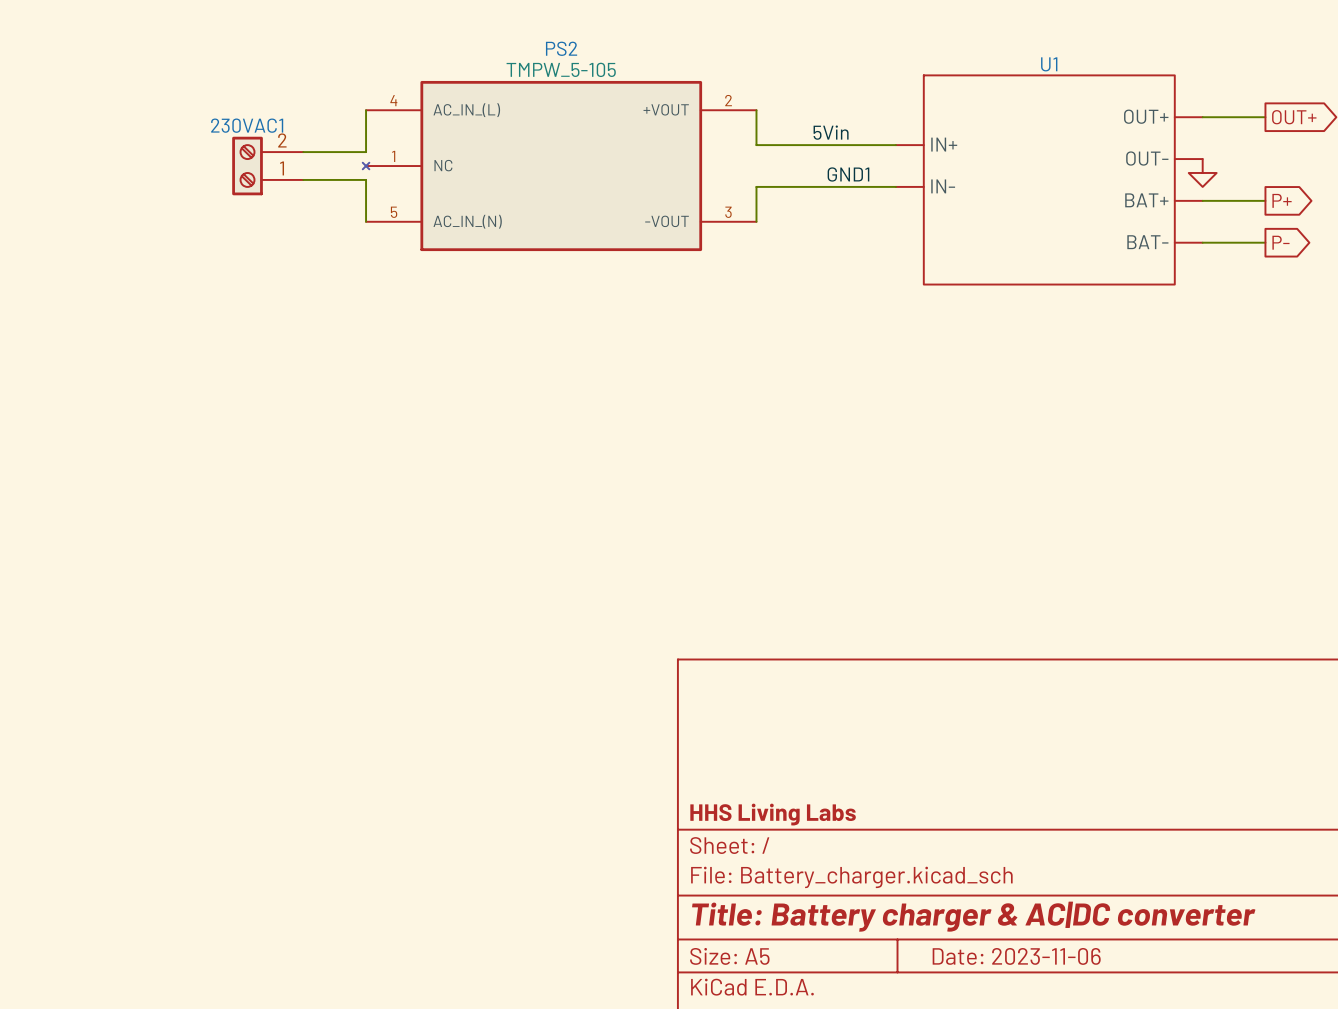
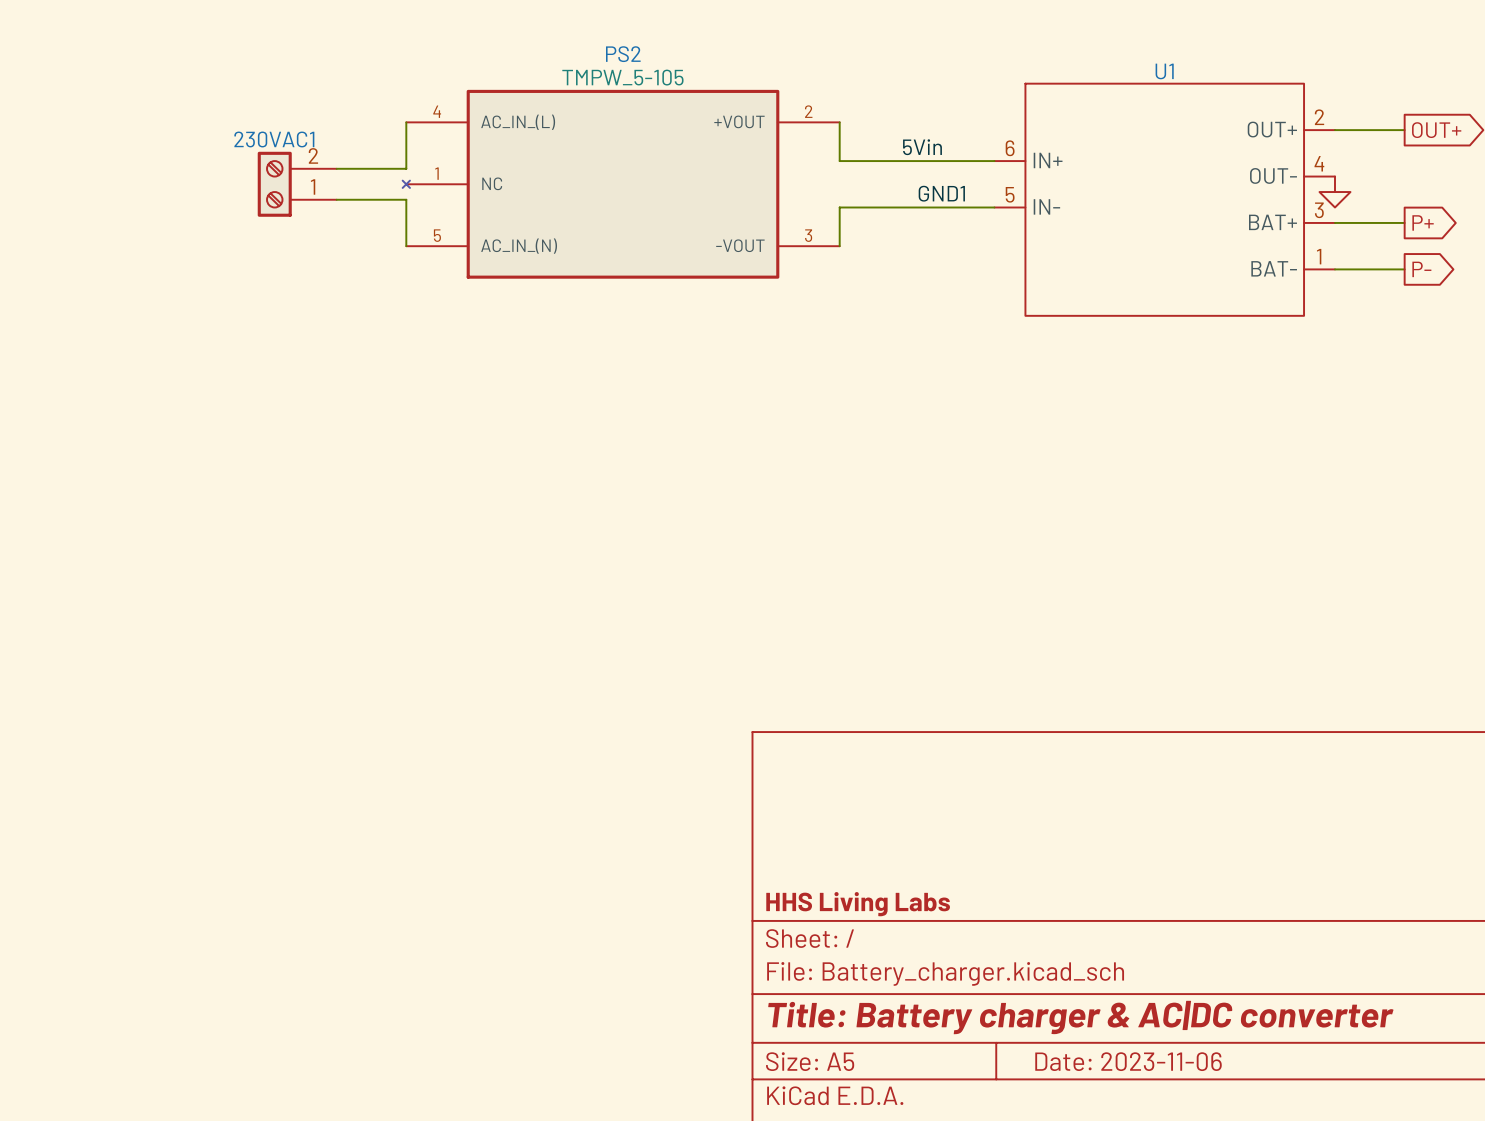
U1 pin number: none -> 2 (1319, 117)
U1 pin number: none -> 6 (1010, 148)
U1 pin number: none -> 4 (1319, 163)
U1 pin number: none -> 5 (1010, 194)
U1 pin number: none -> 3 (1319, 210)
U1 pin number: none -> 1 (1319, 256)

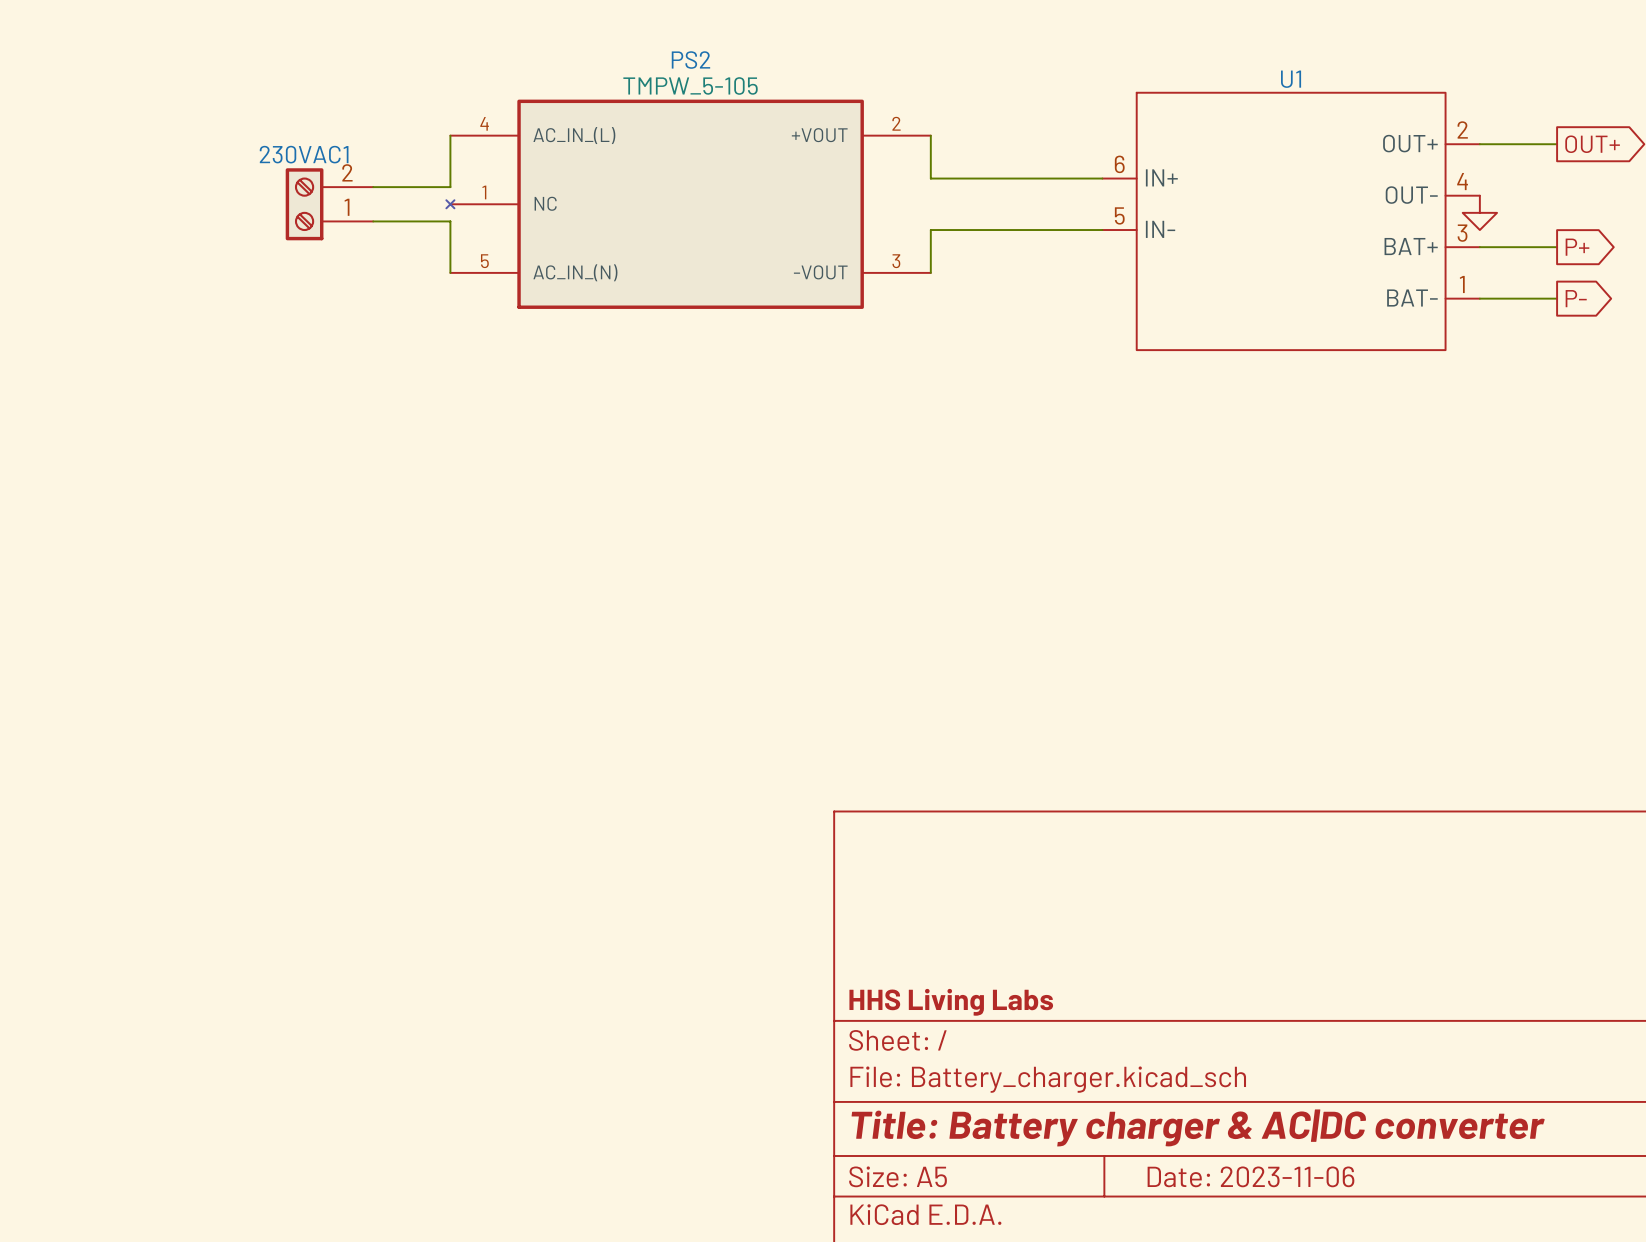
label: 5Vin (922, 147) -> none
label: GND1 (941, 193) -> none

